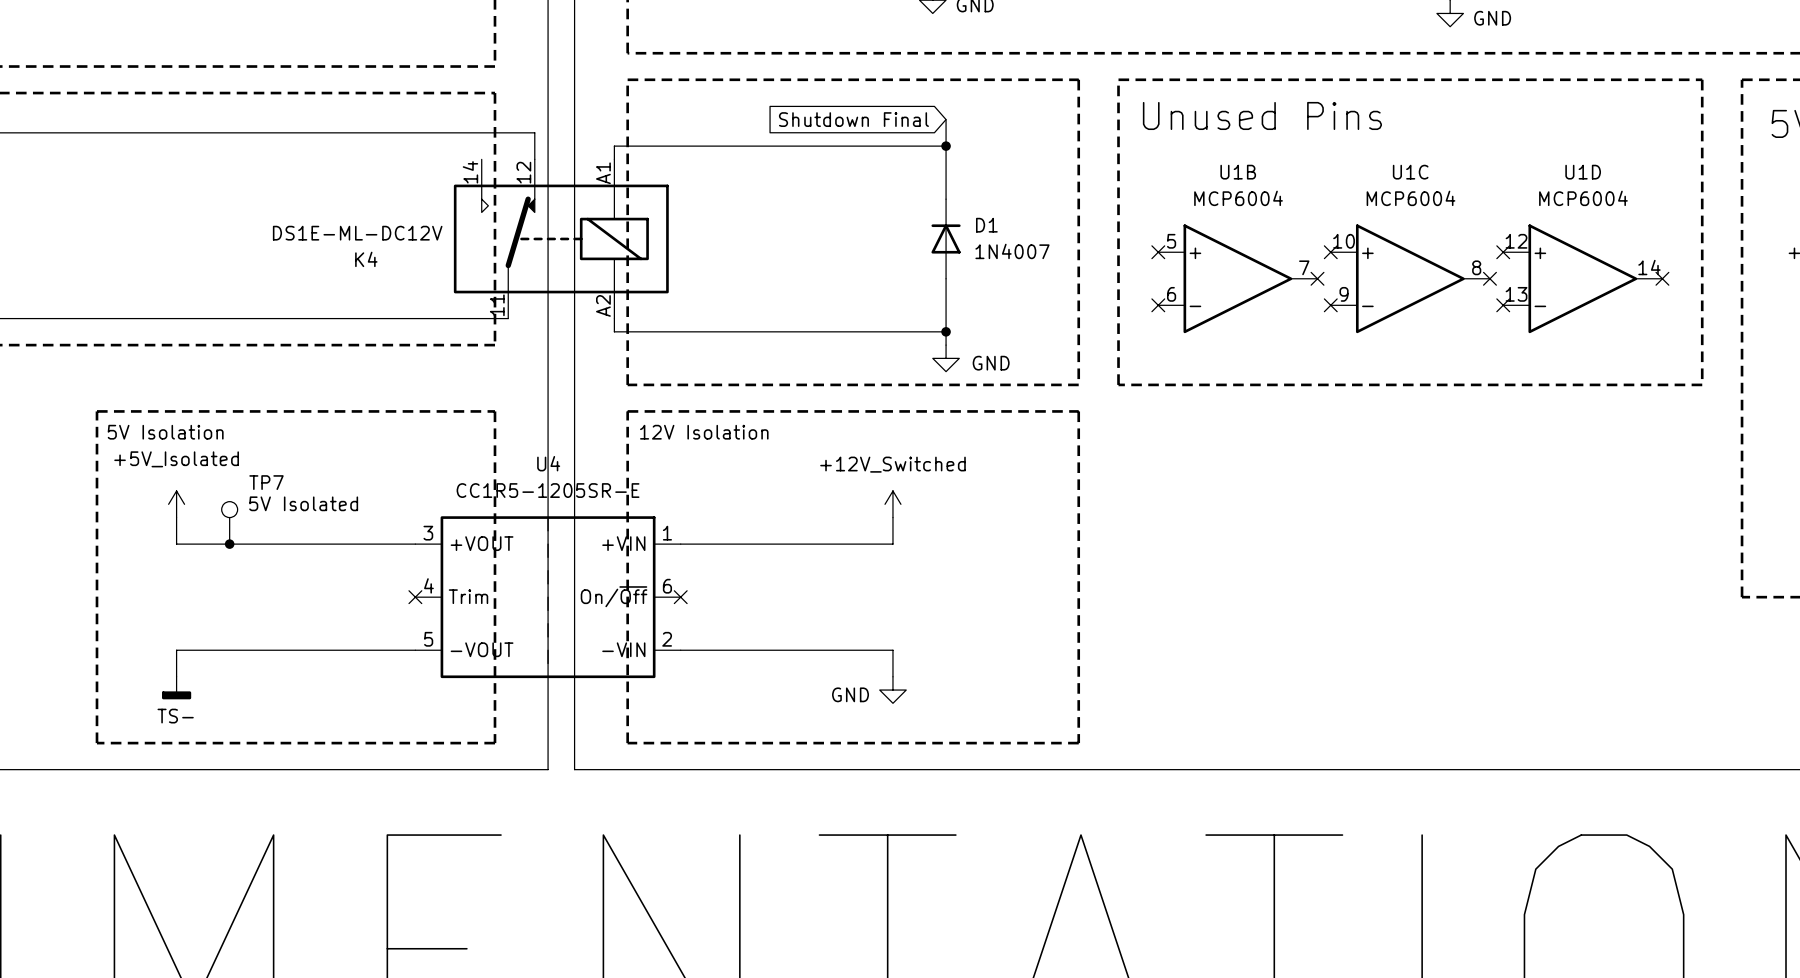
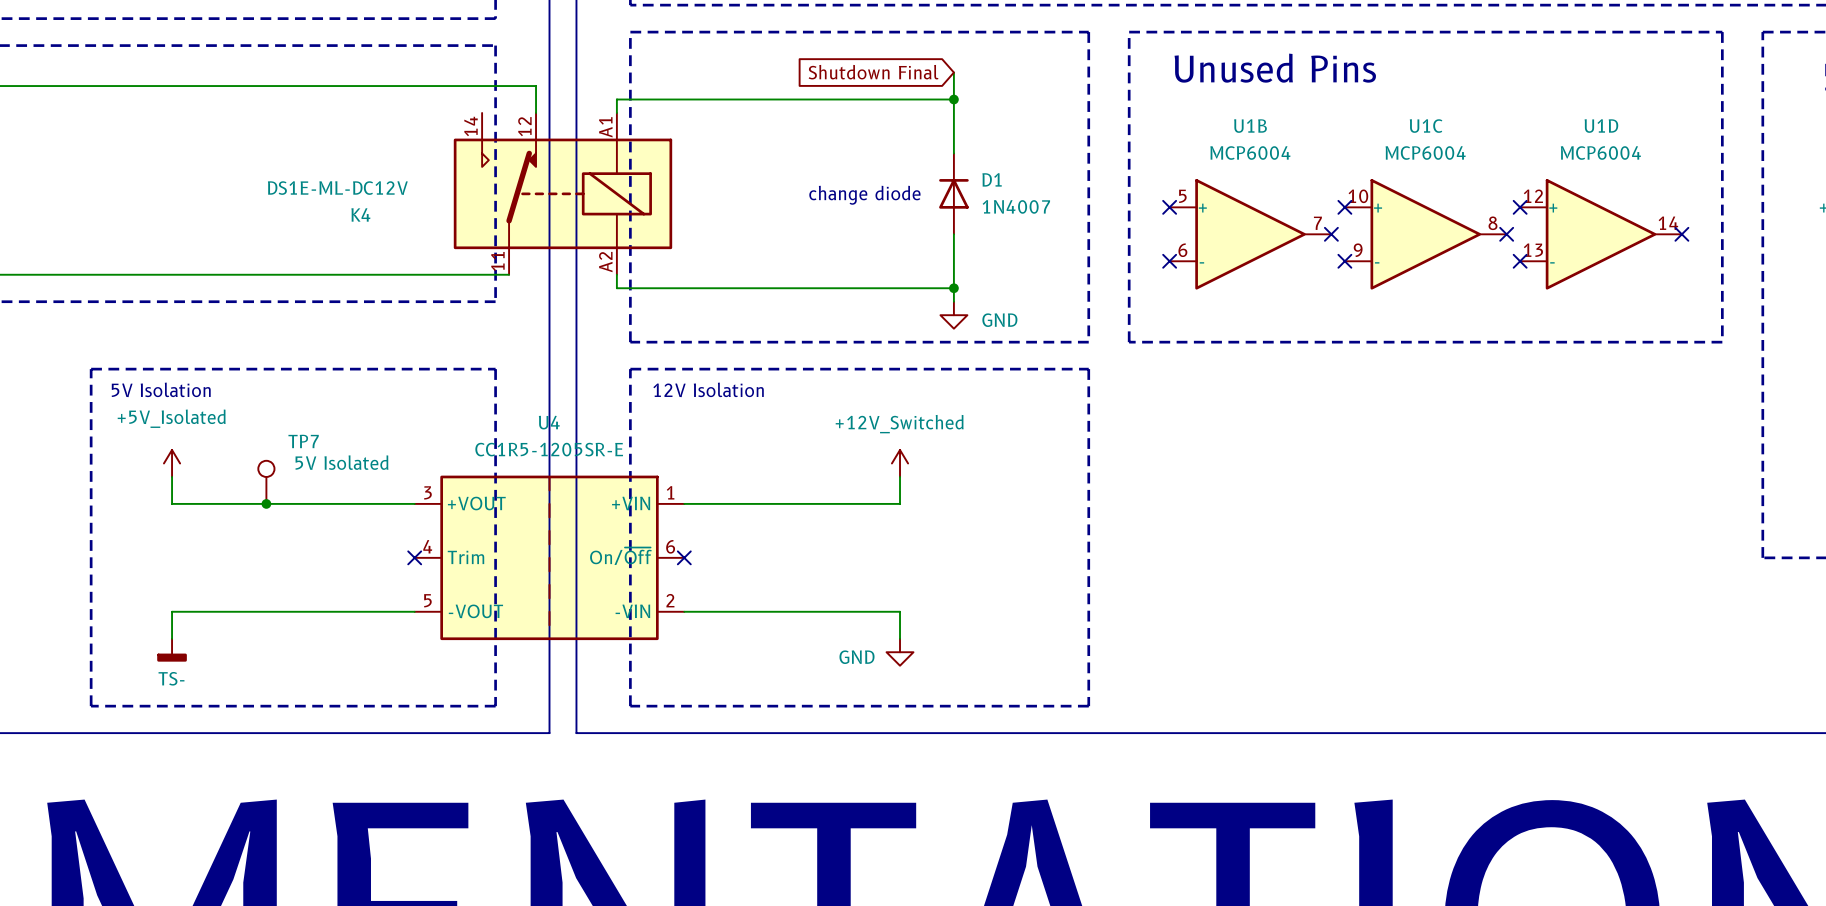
text: none -> change diode (864, 195)
TP7 position: (229, 522) -> (266, 482)
junction position: (229, 544) -> (266, 503)

